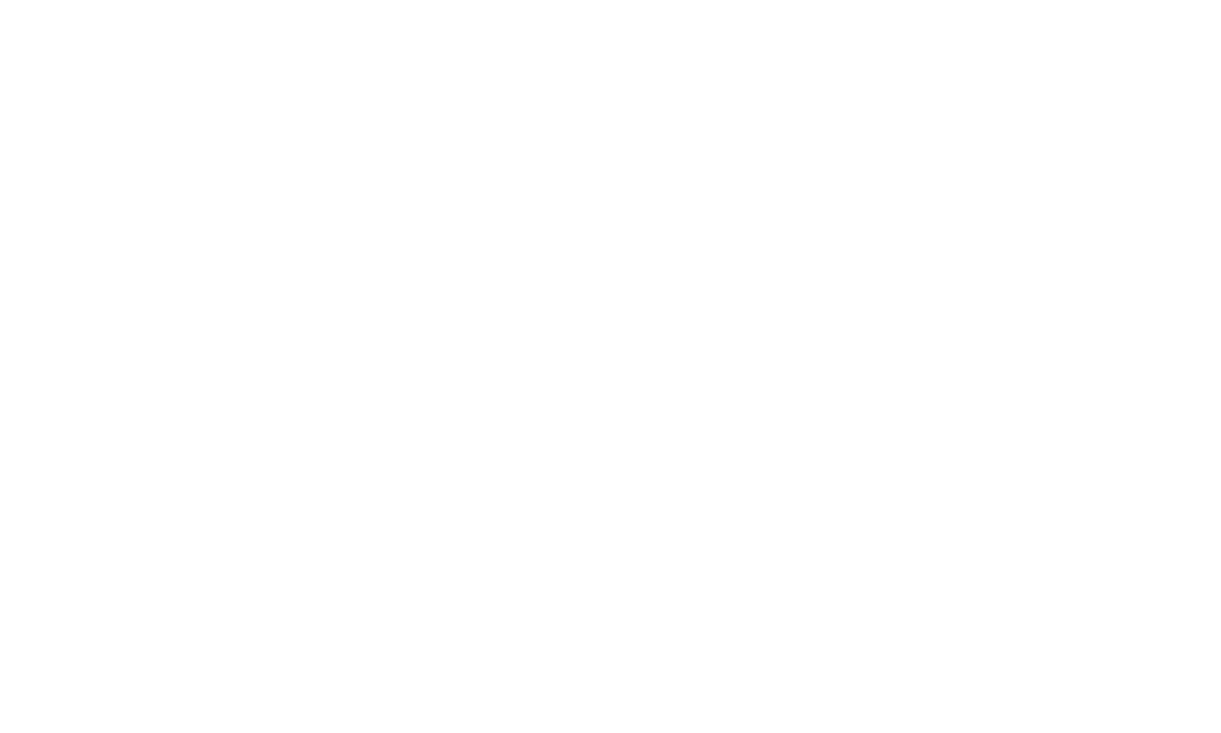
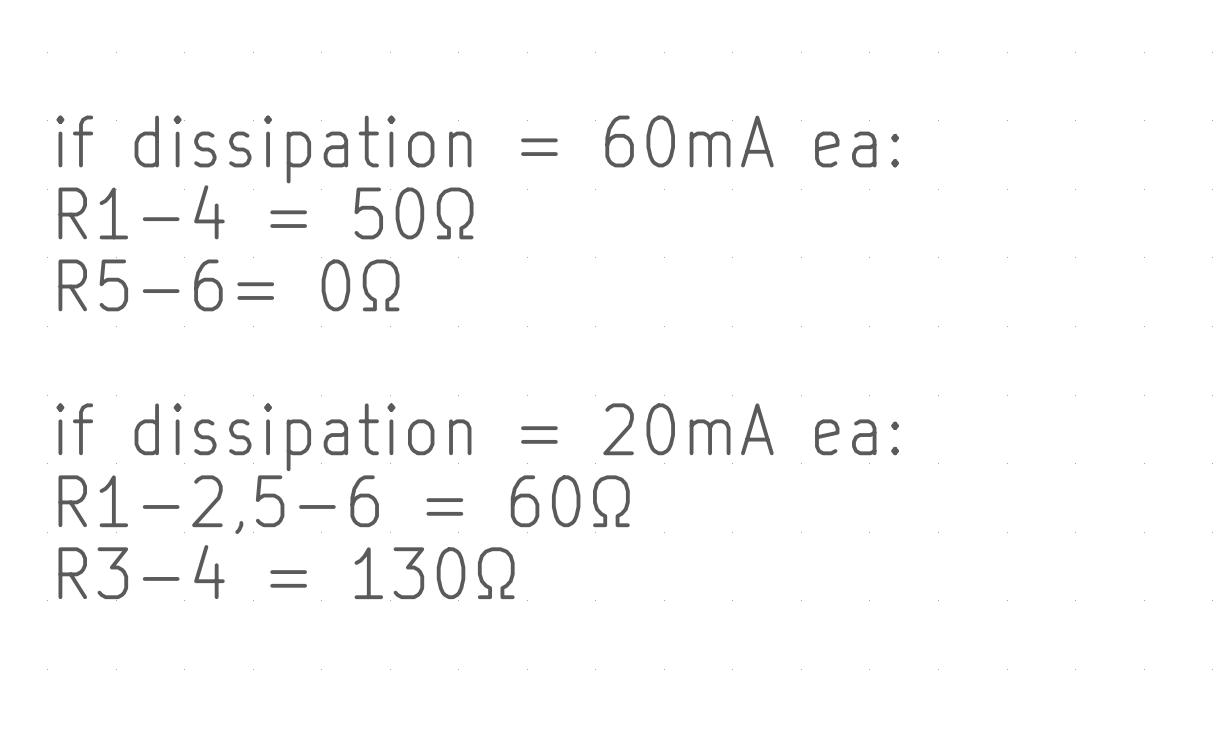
text: none -> if dissipation = 60mA ea: (477, 149)
text: none -> R1-4 = 50Ω (266, 212)
text: none -> R5-6= 0Ω (229, 285)
text: none -> if dissipation = 20mA ea: (477, 437)
text: none -> R1-2,5-6 = 60Ω (344, 504)
text: none -> R3-4 = 130Ω (286, 572)

